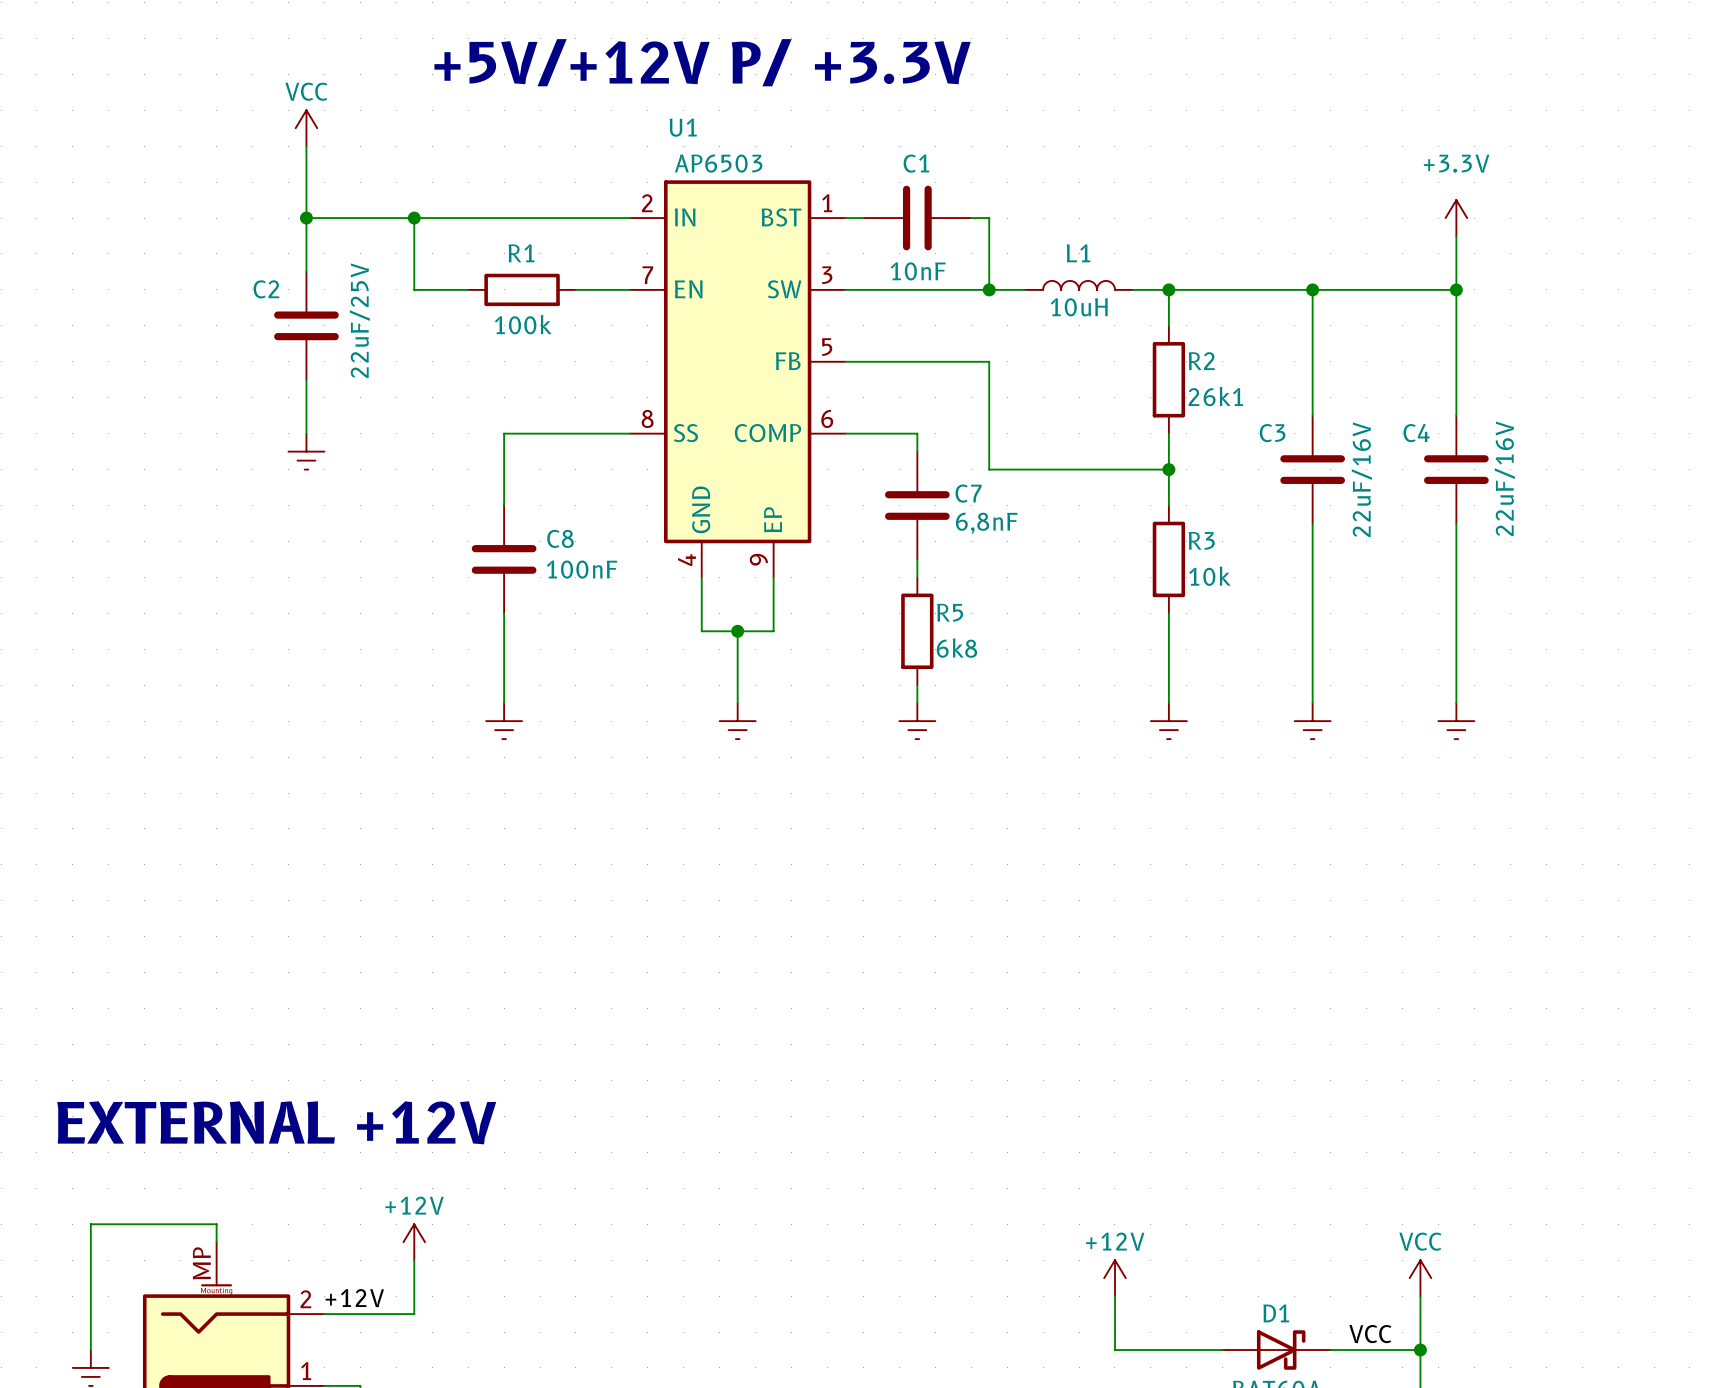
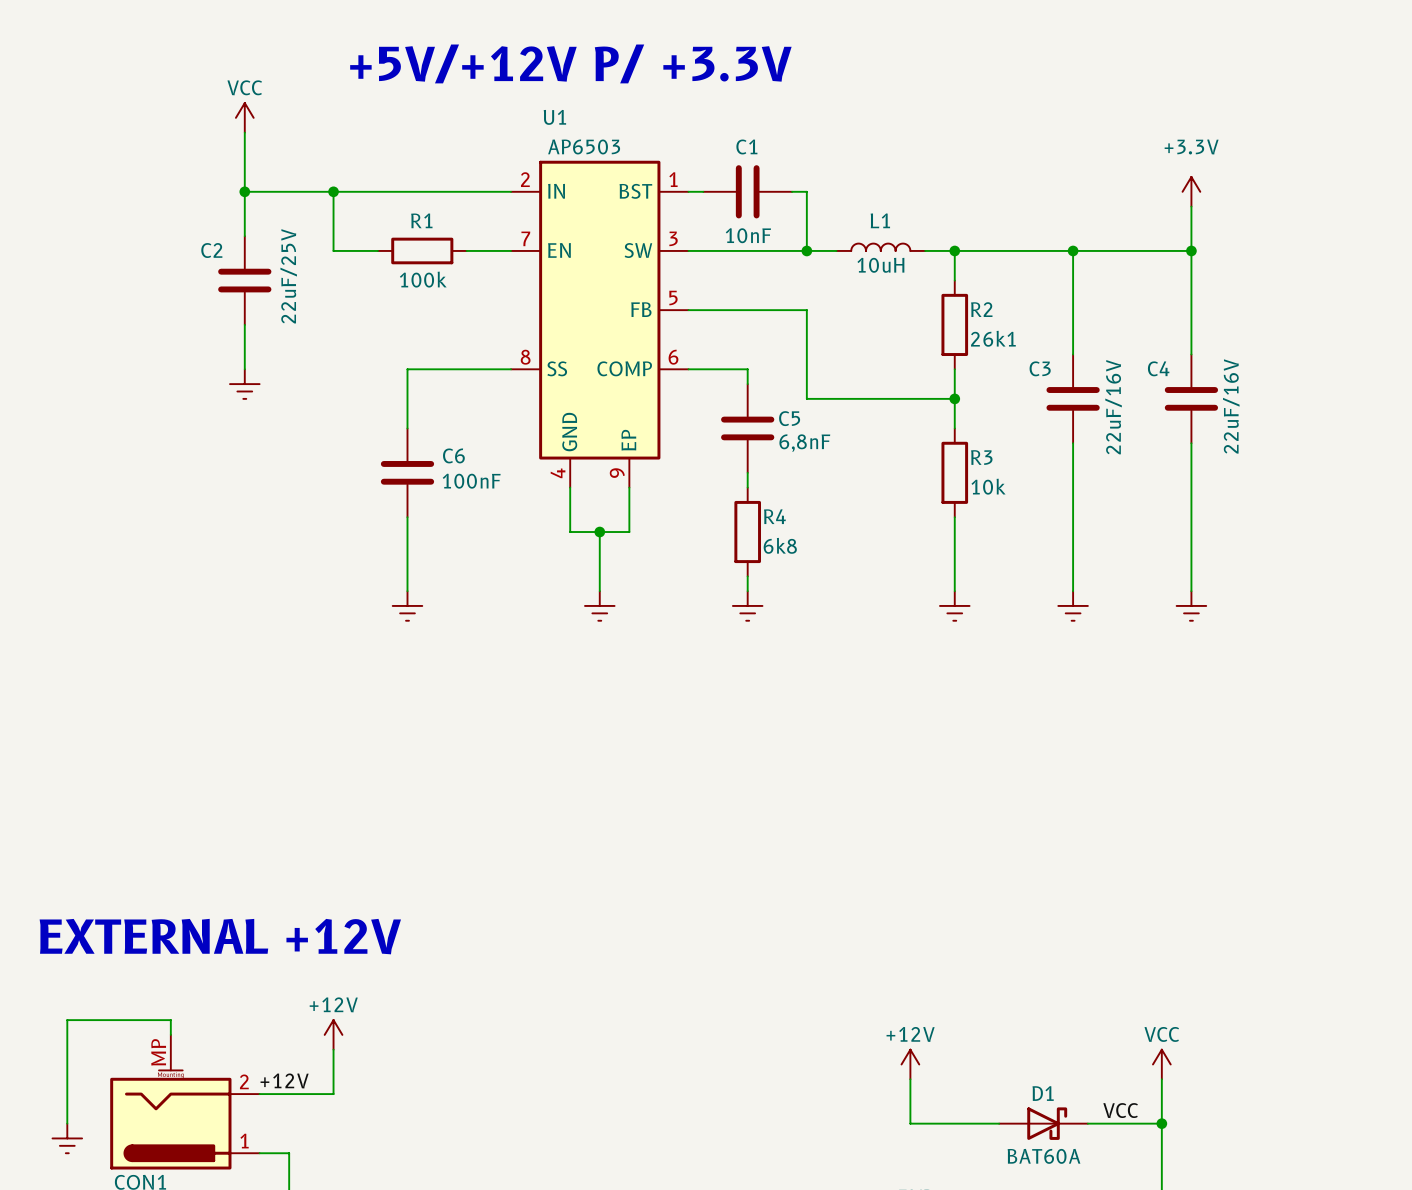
C7 name: C7 (968, 493) -> C5 (789, 418)
C8 name: C8 (560, 538) -> C6 (453, 455)
R5 name: R5 (950, 612) -> R4 (774, 516)

